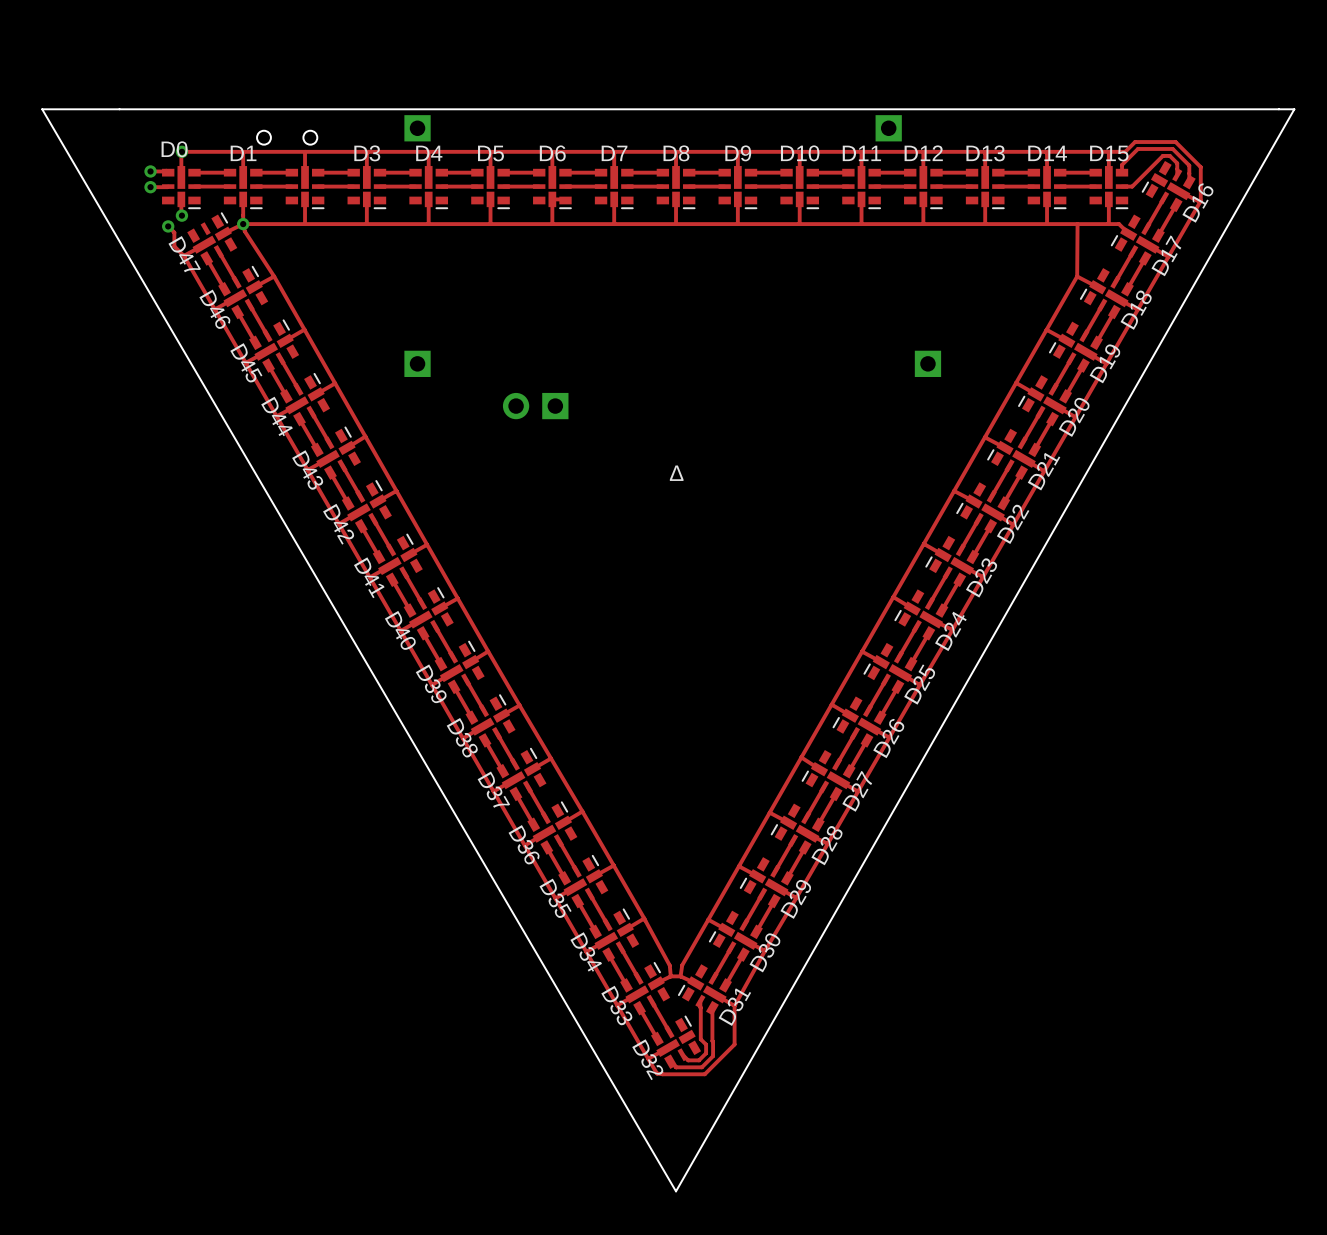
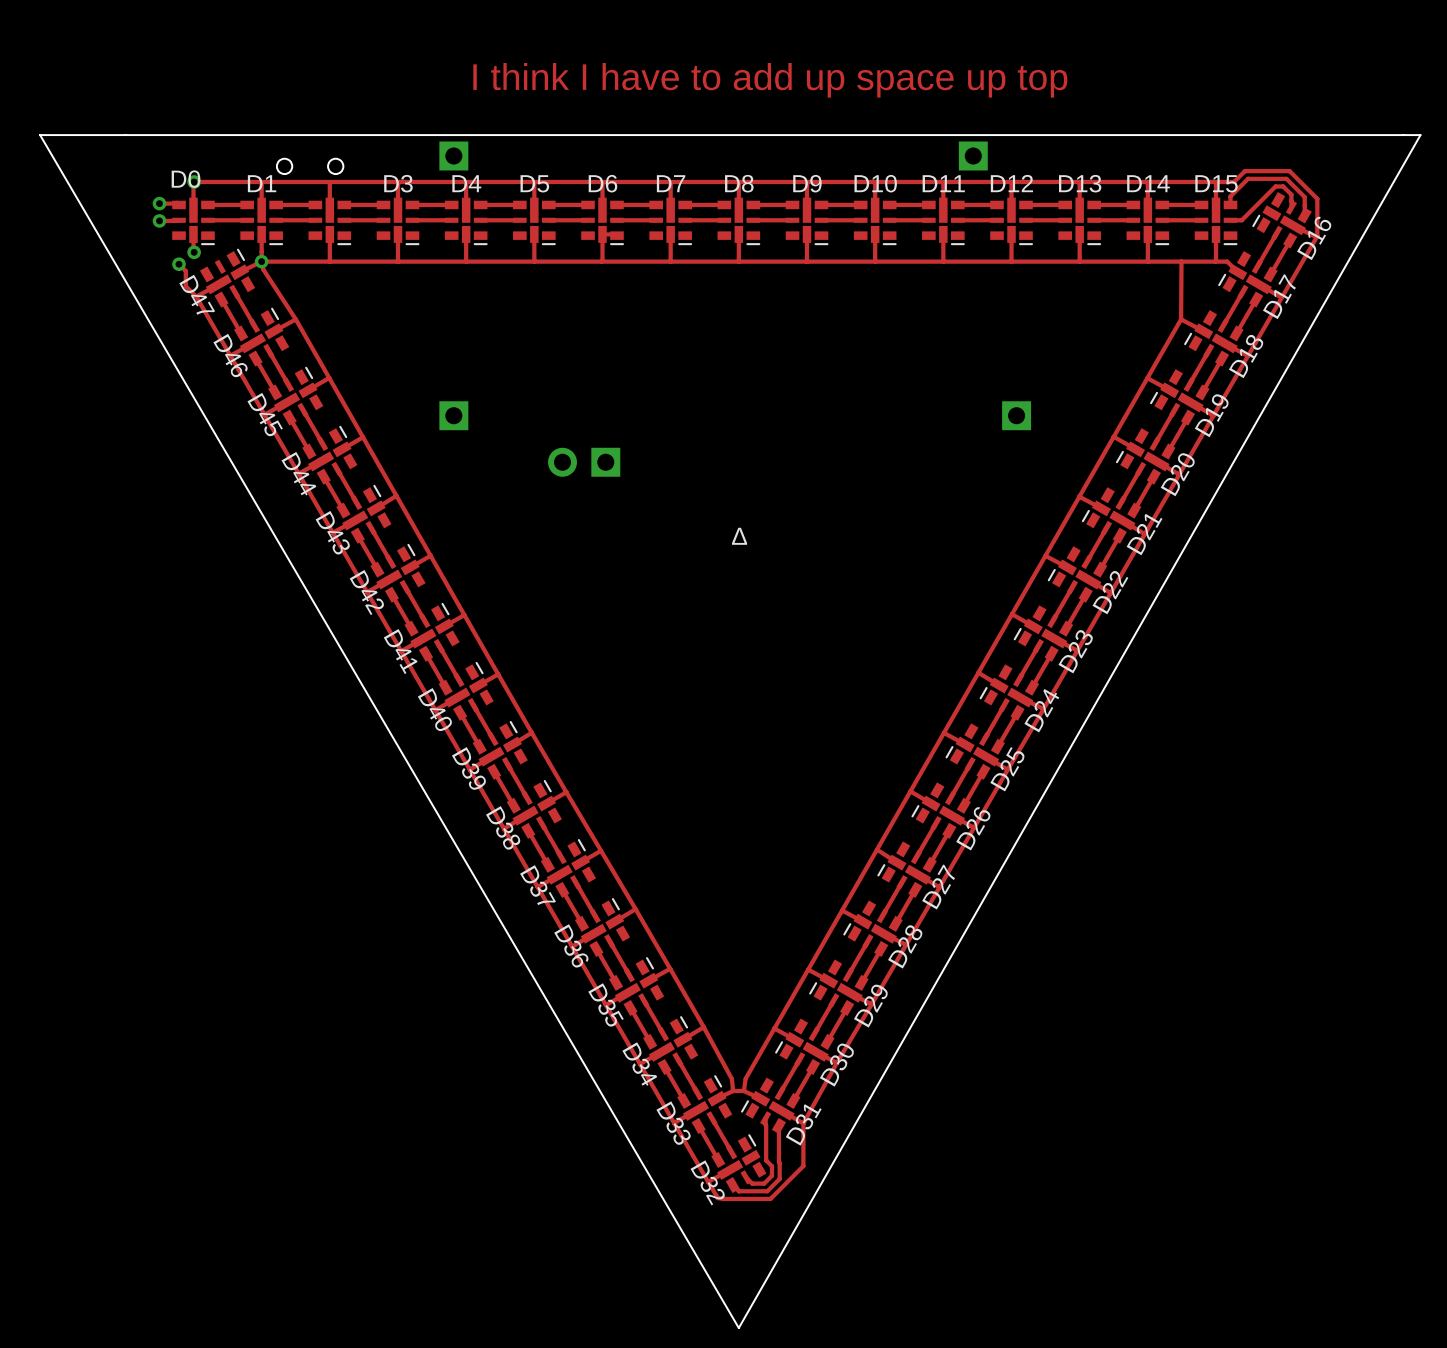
text: none -> I think I have to add up space up top (770, 80)

